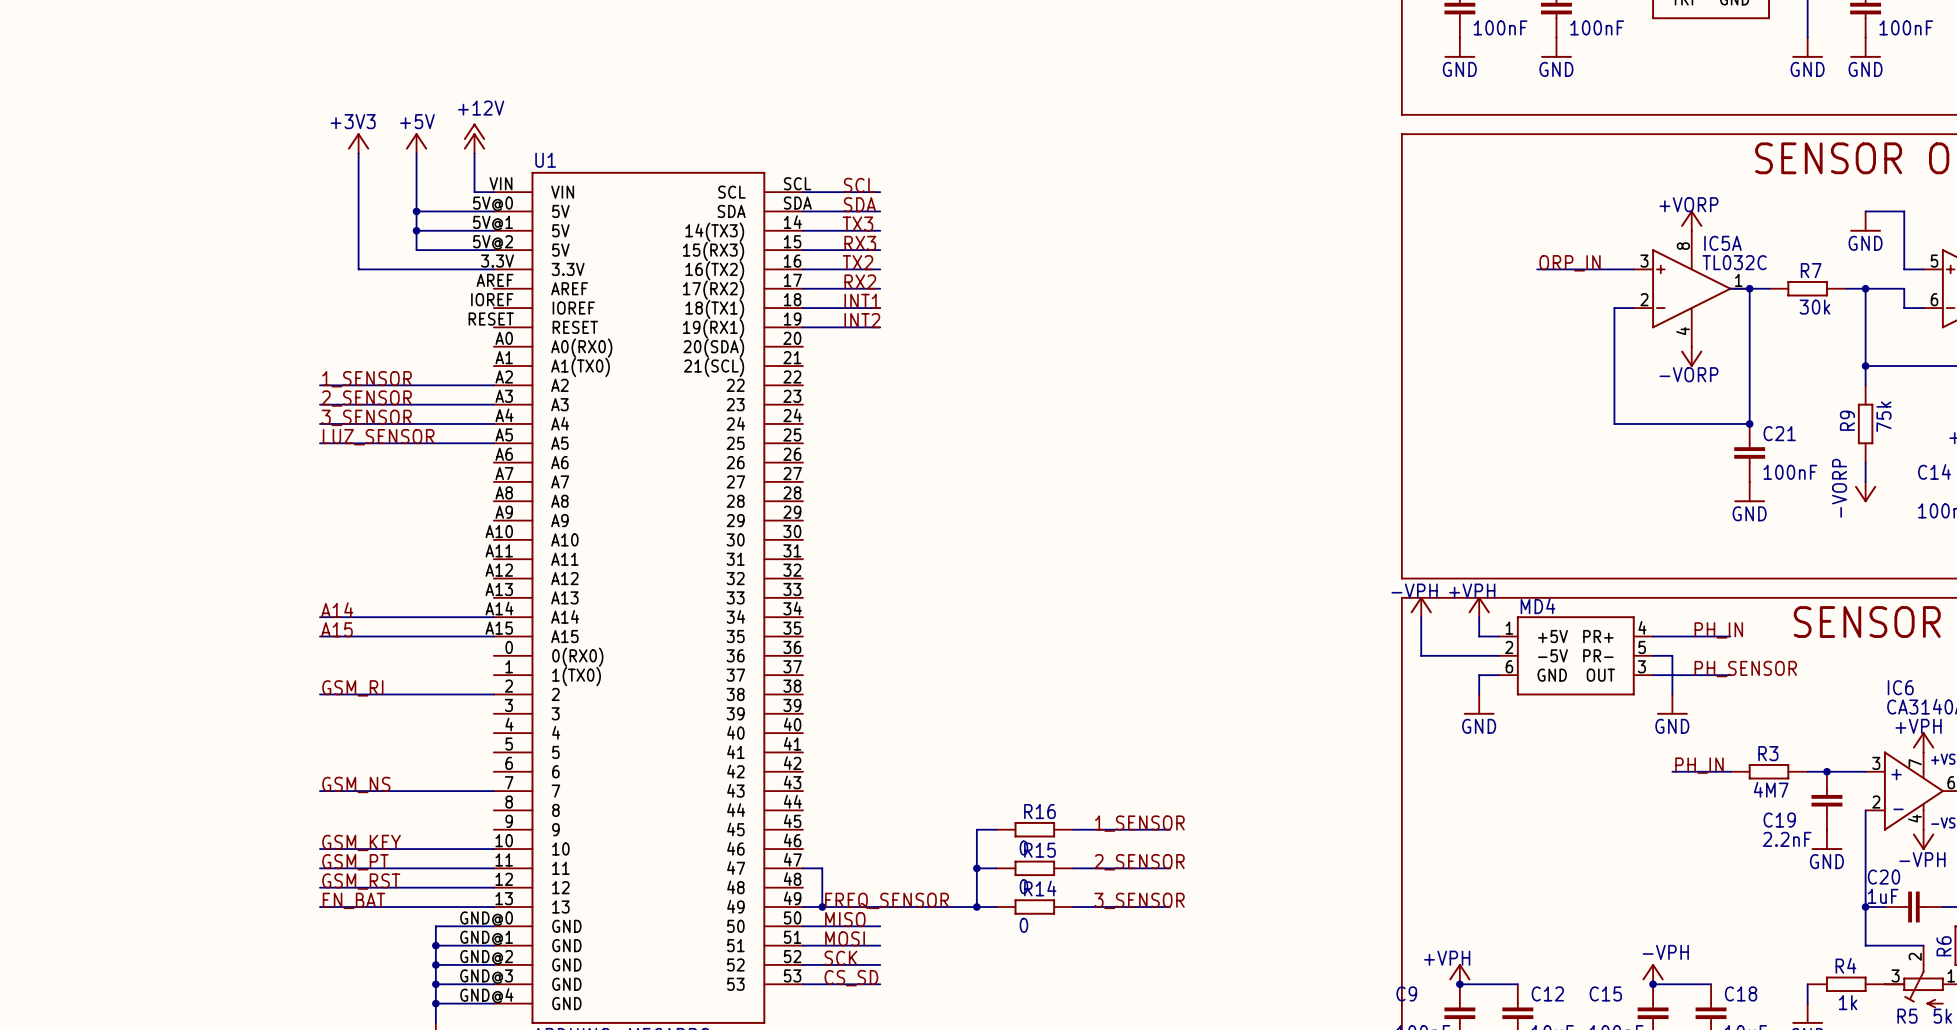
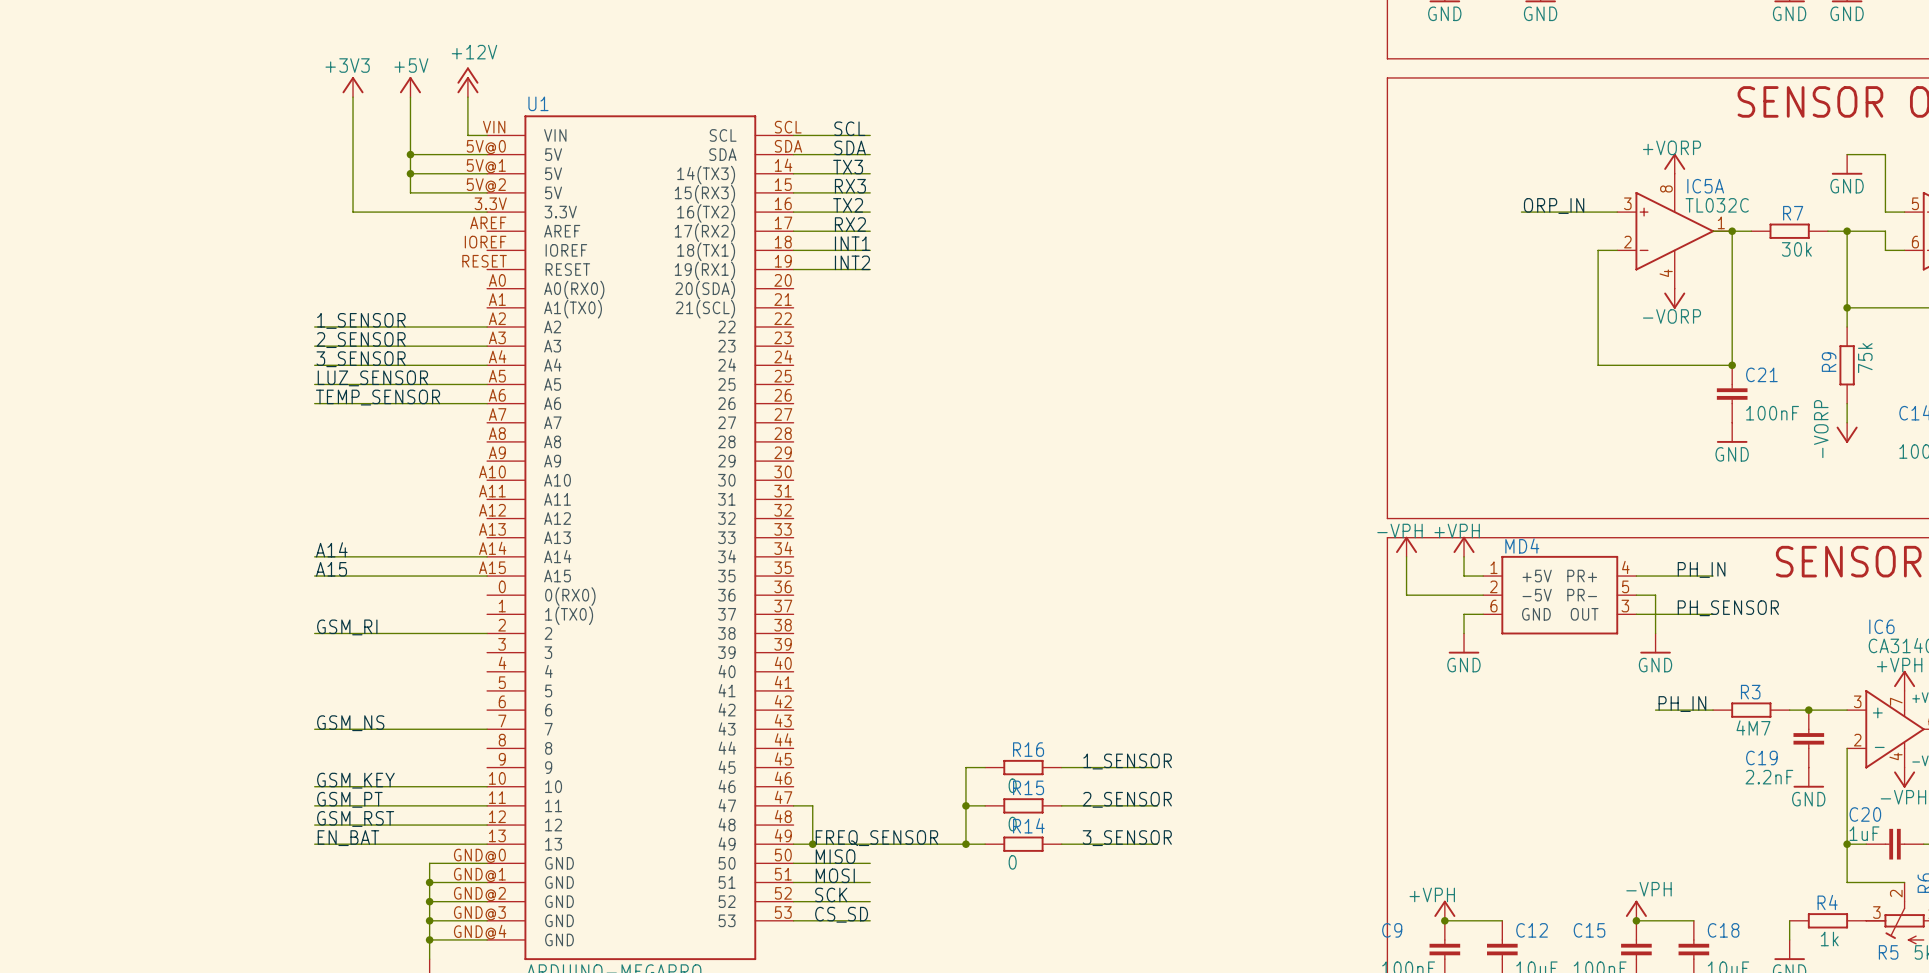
label: none -> TEMP_SENSOR (378, 397)
wire: none -> (314, 403) (487, 403)

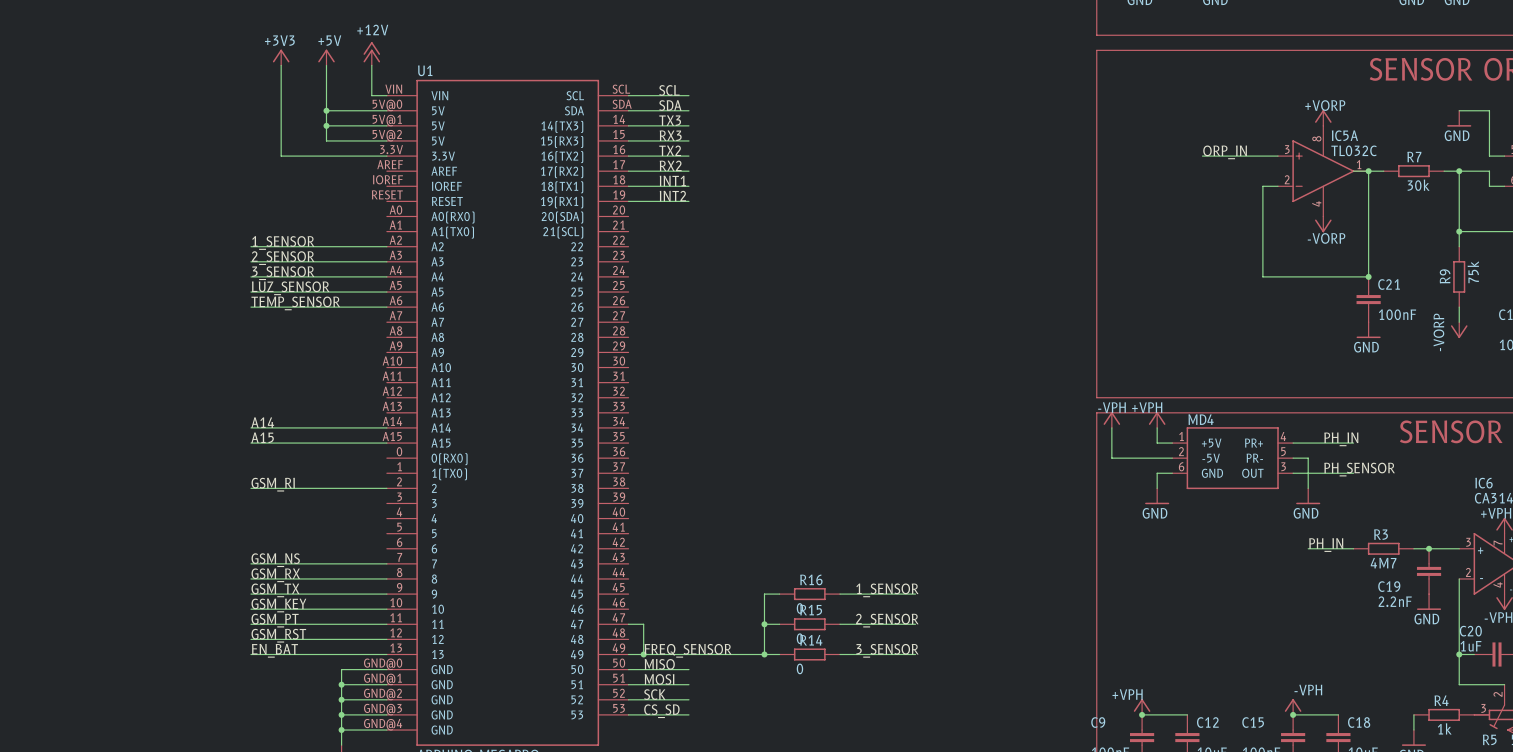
label: none -> GSM_RX (275, 575)
wire: none -> (250, 578) (386, 578)
label: none -> GSM_TX (275, 590)
wire: none -> (250, 594) (386, 594)

